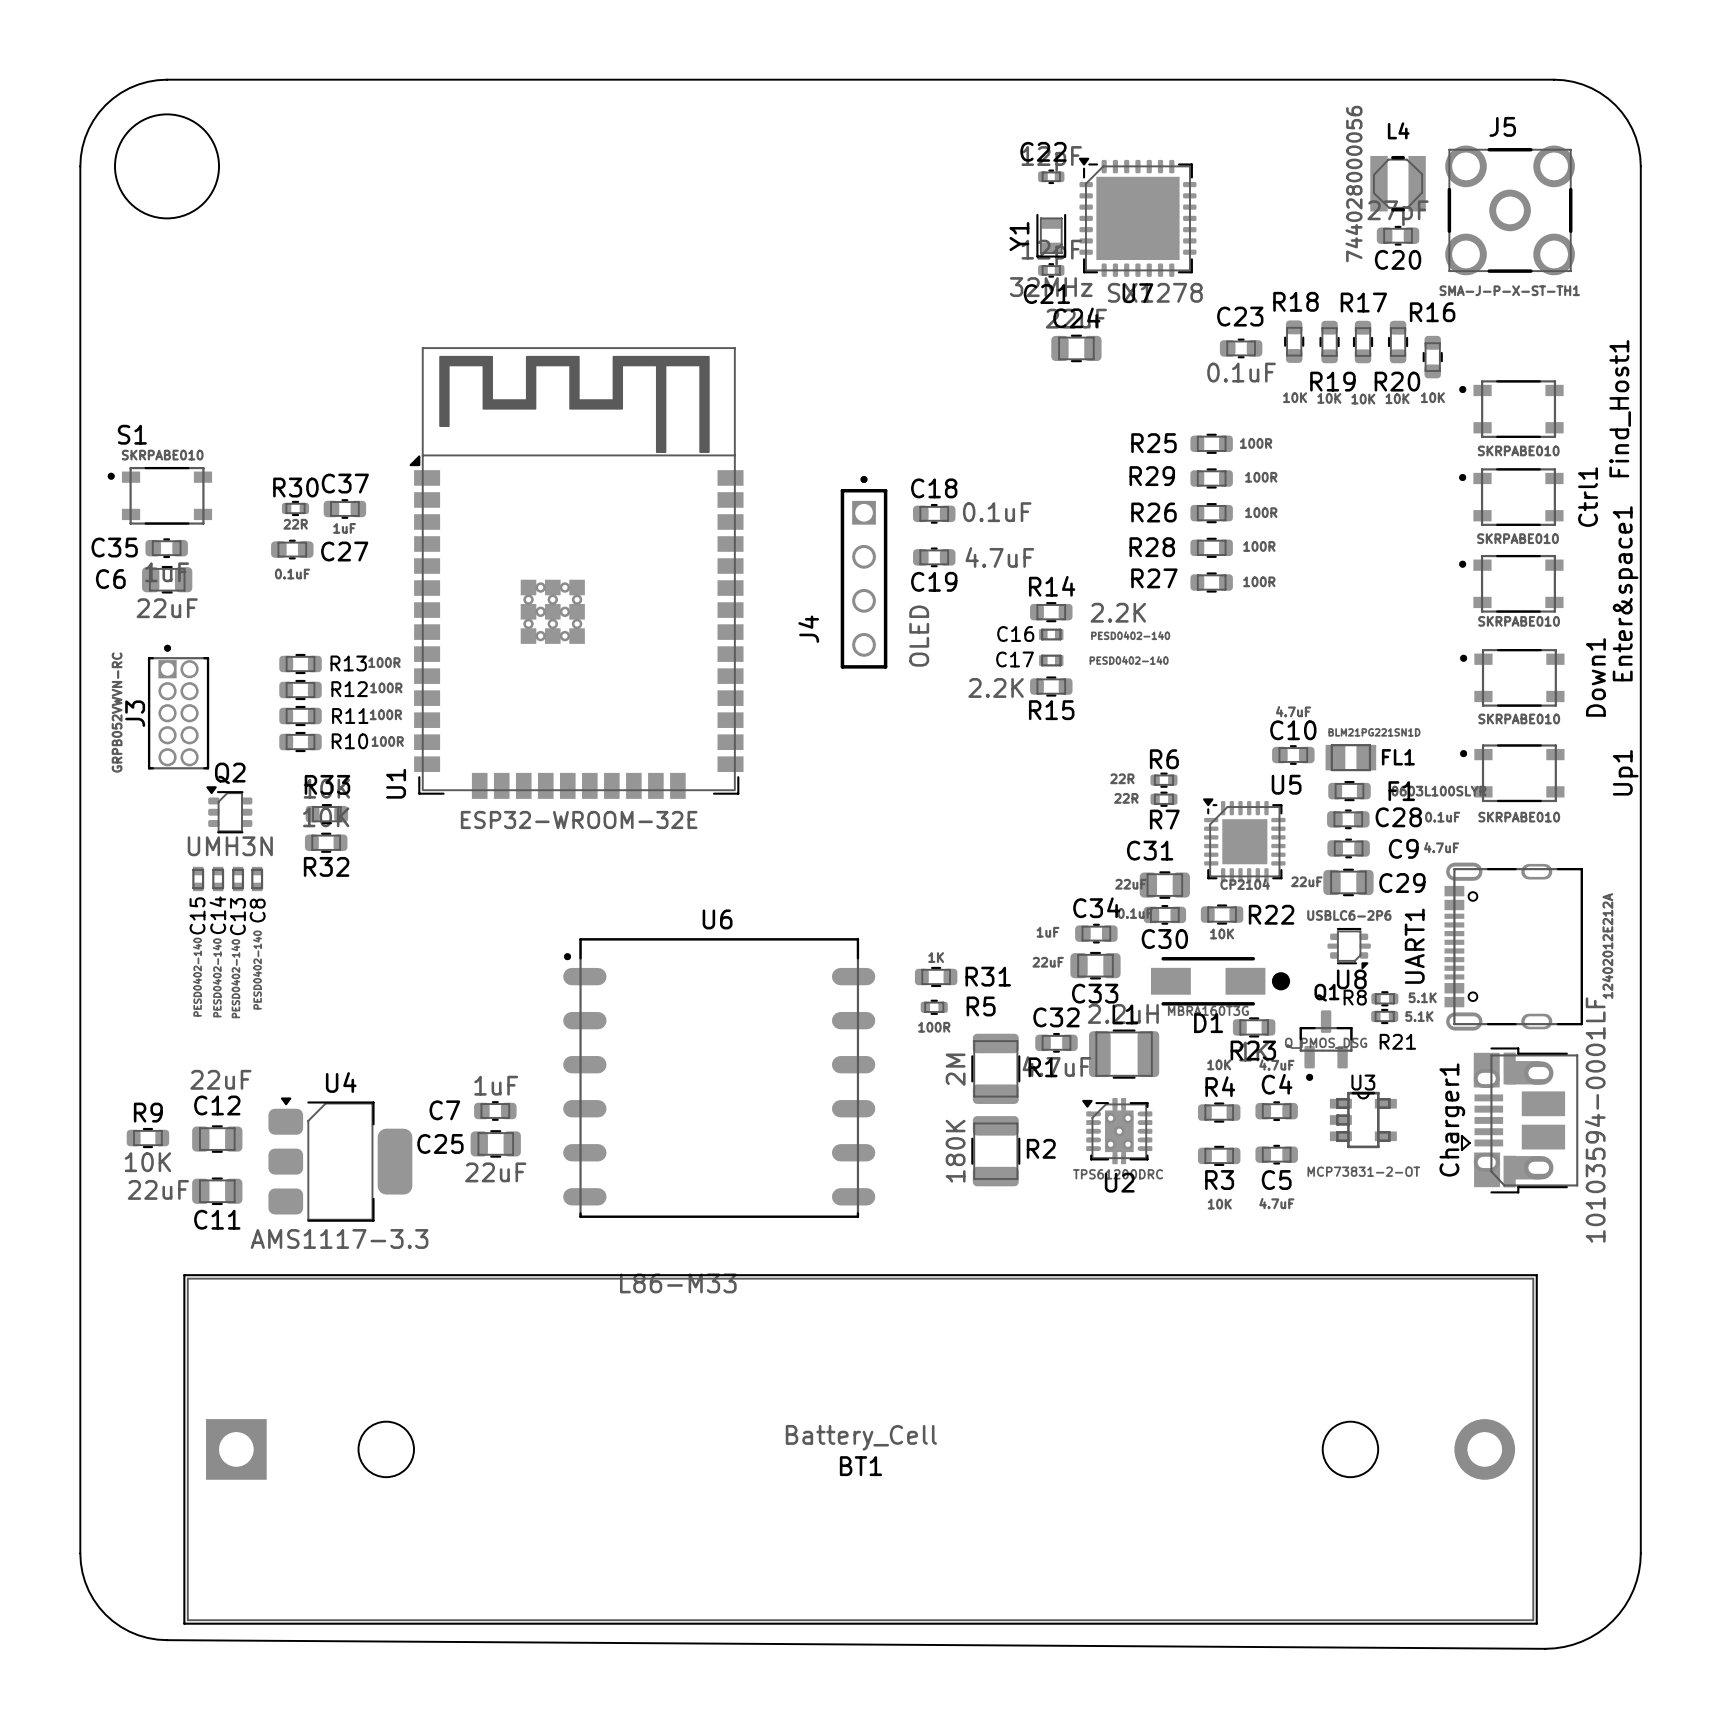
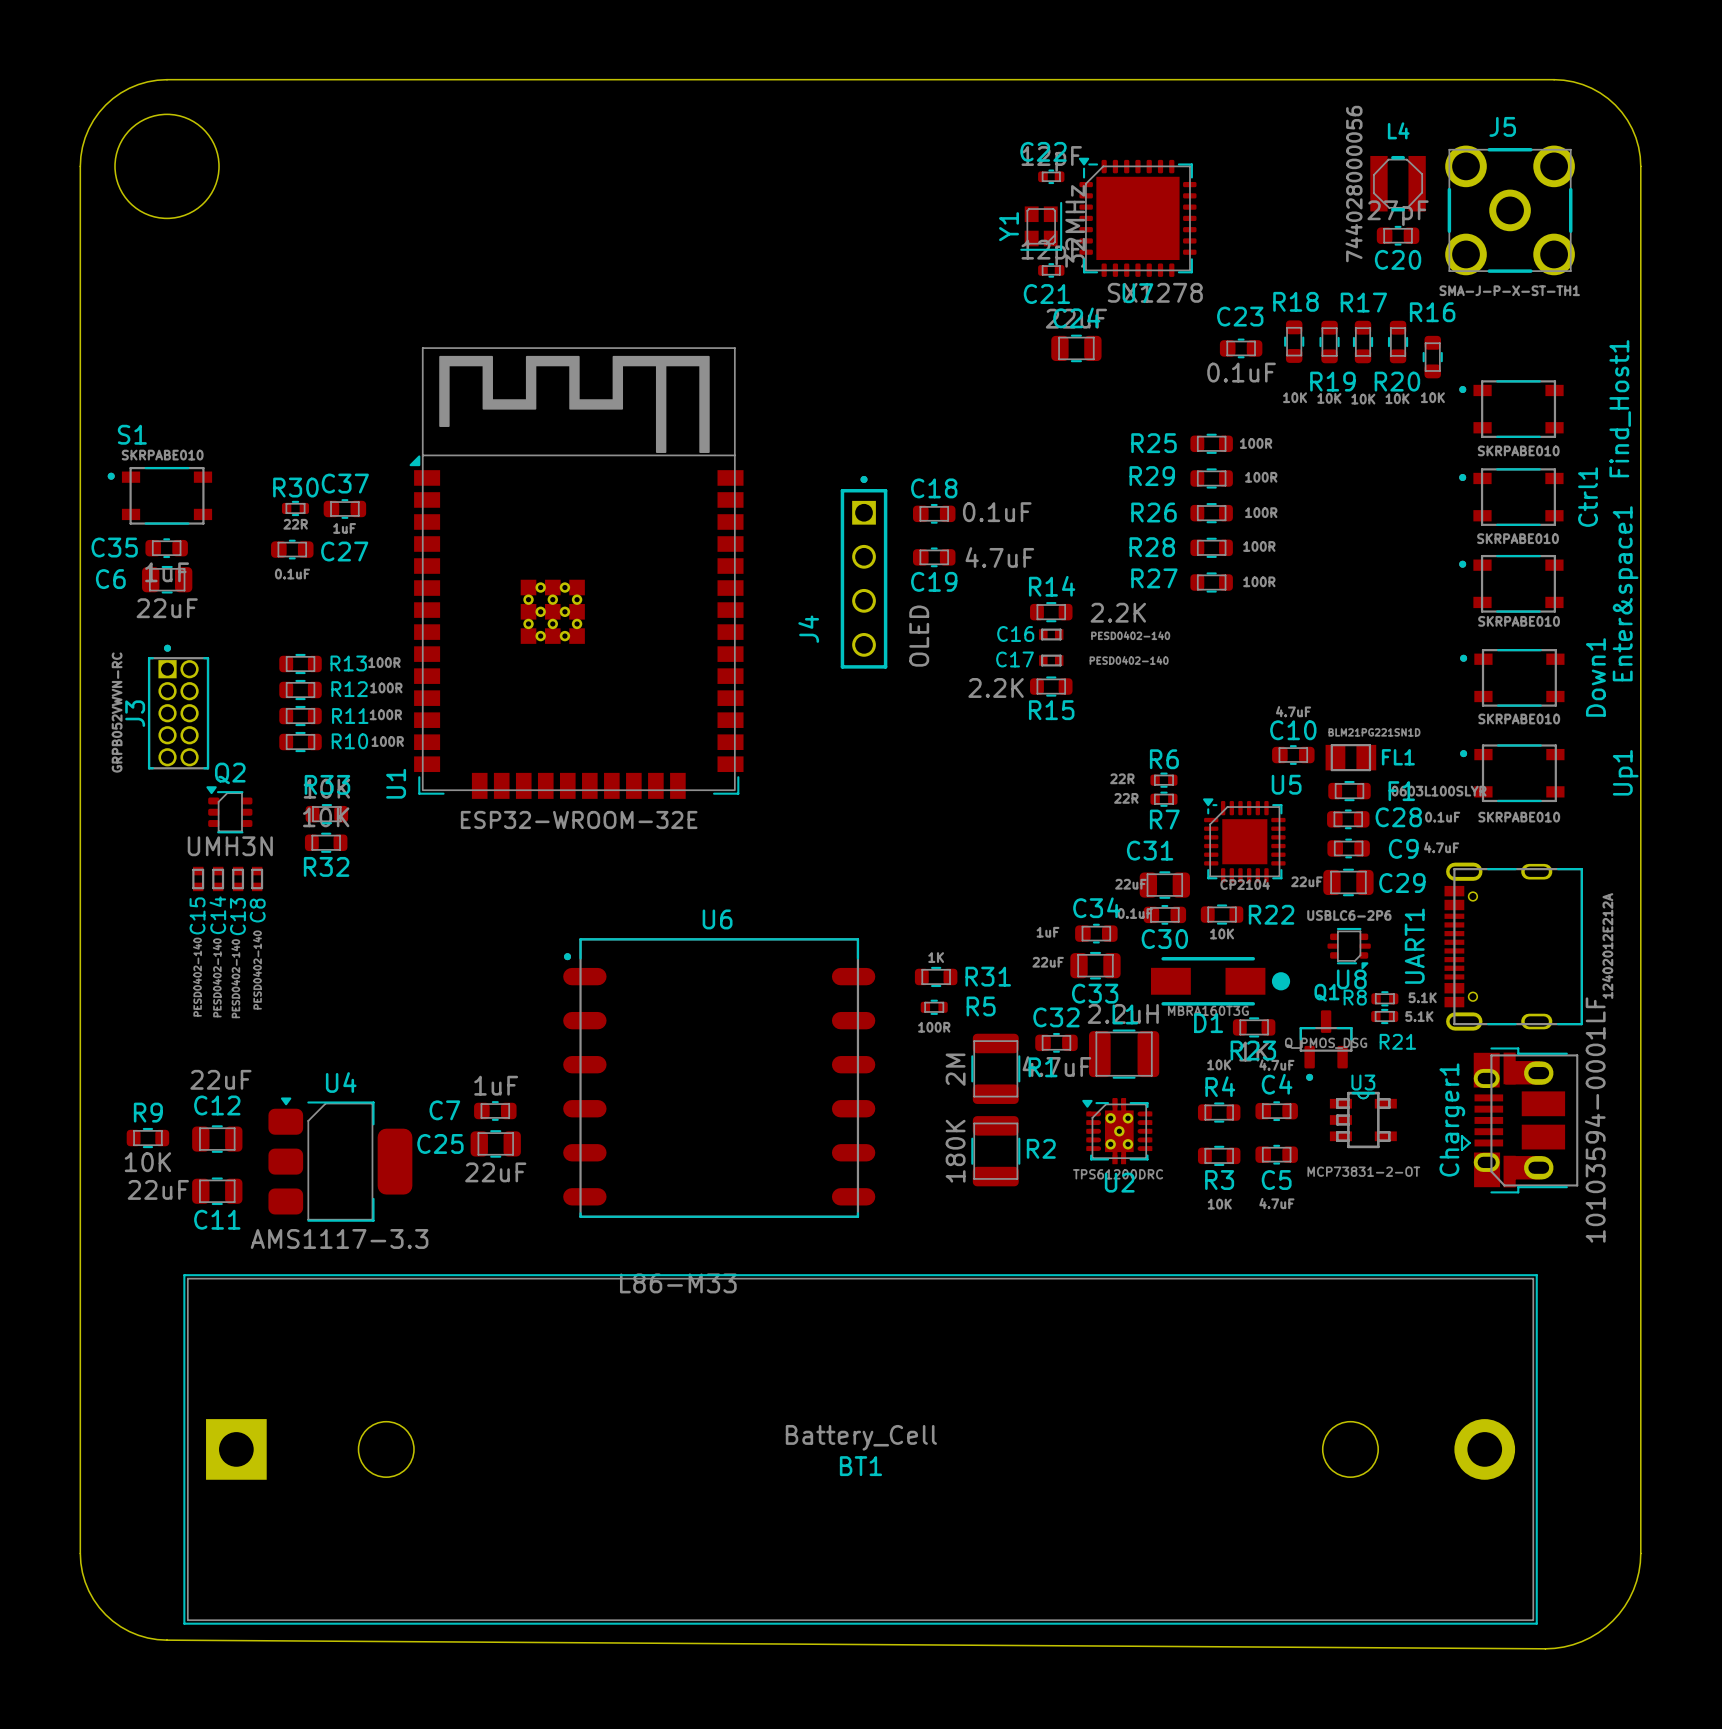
Y1 footprint: [1036, 213, 1067, 258] -> [1020, 201, 1063, 251]
Y1 value position: 32MHz (1051, 287) -> 32MHz (1075, 226)

